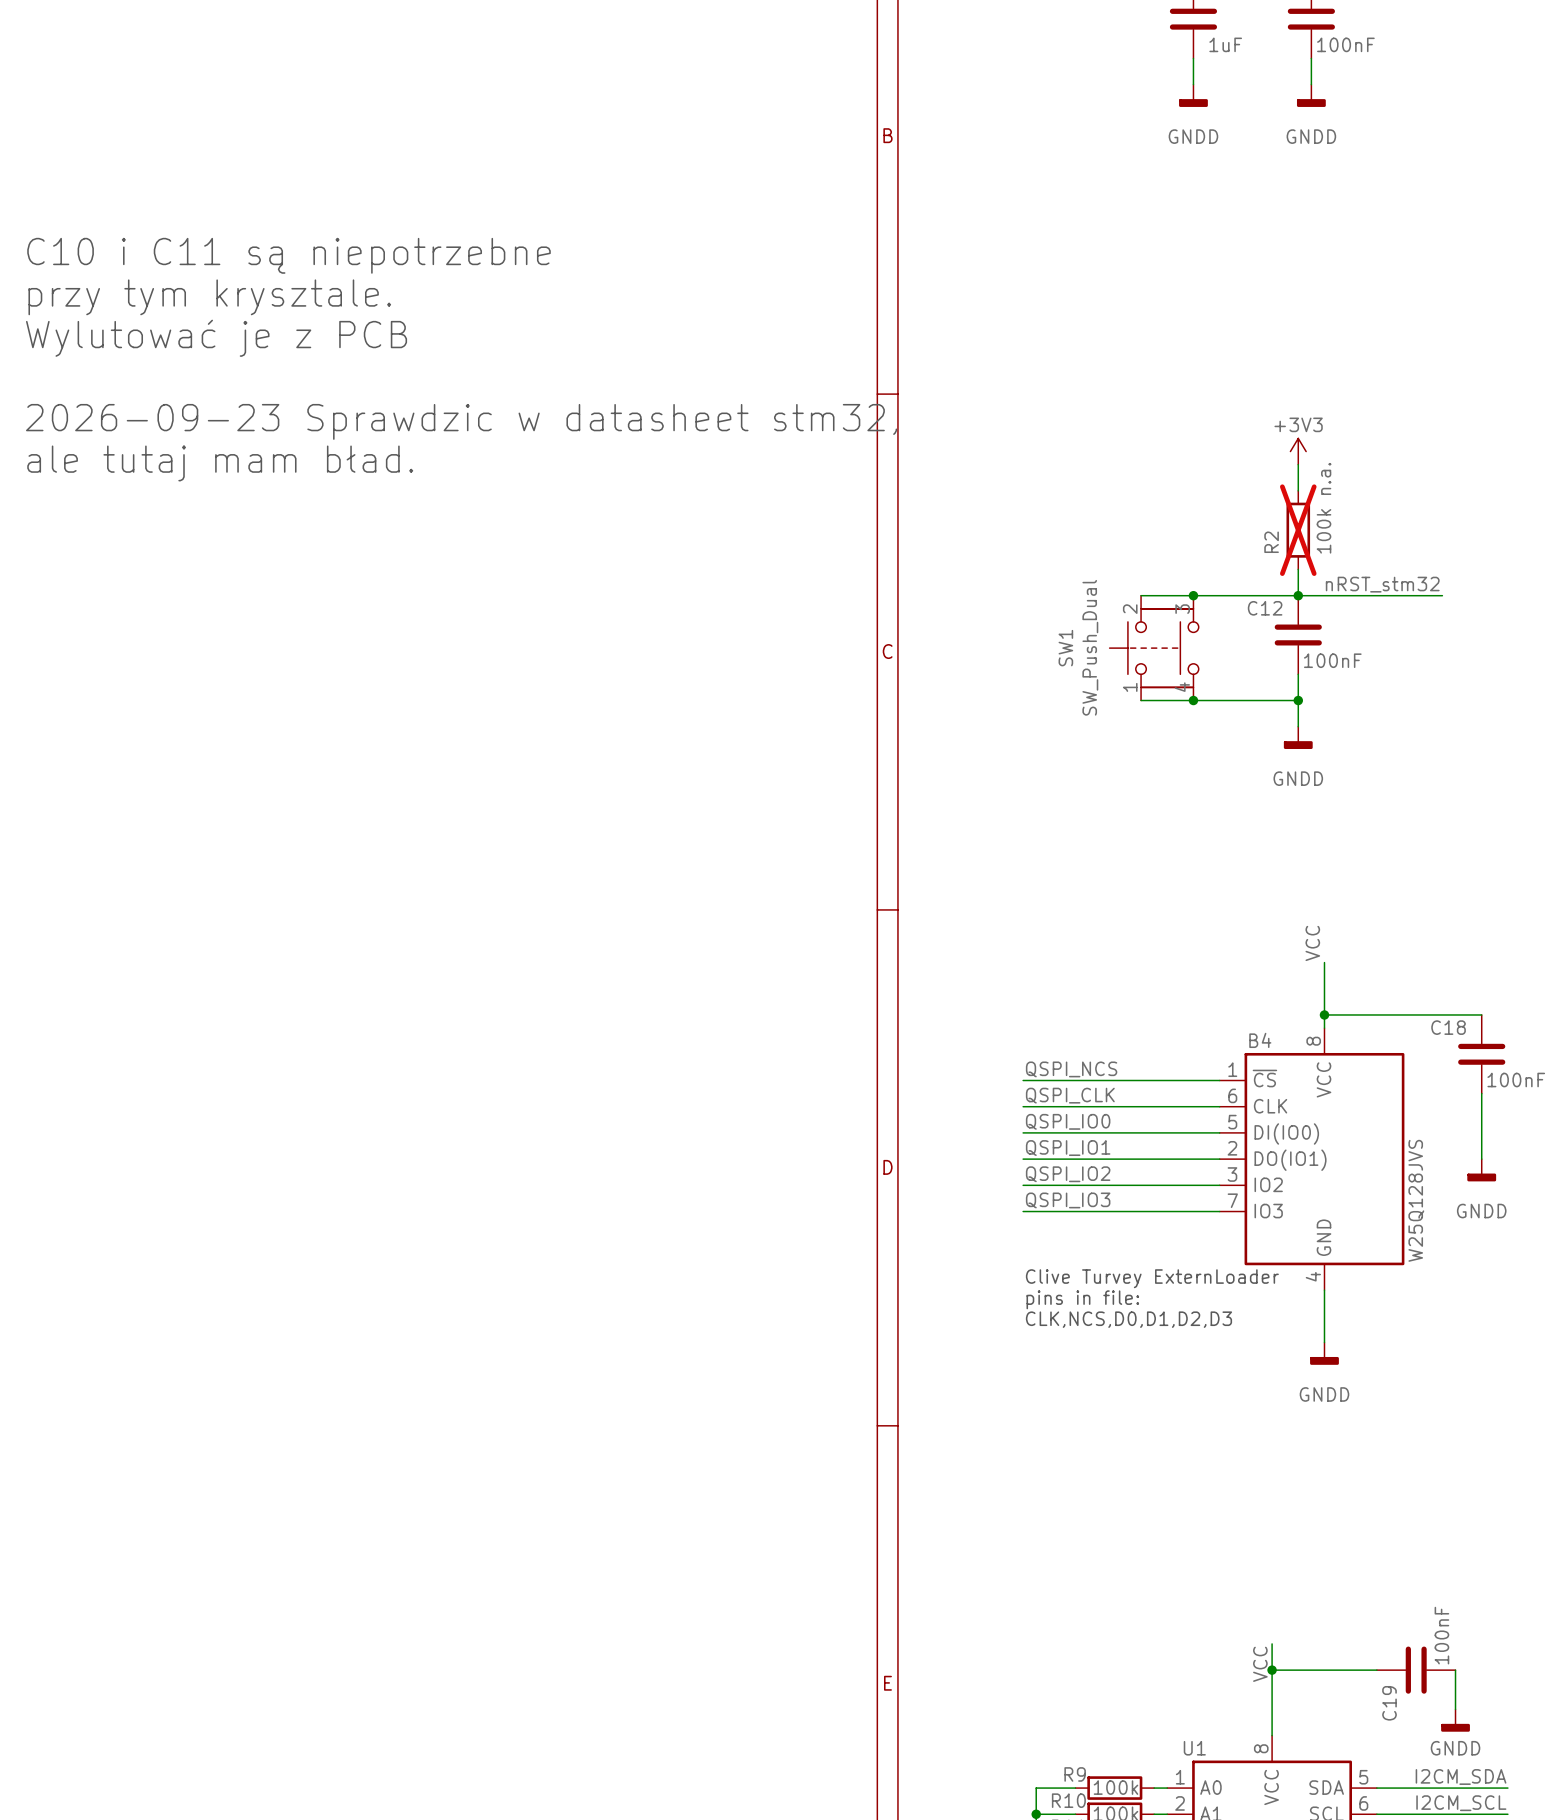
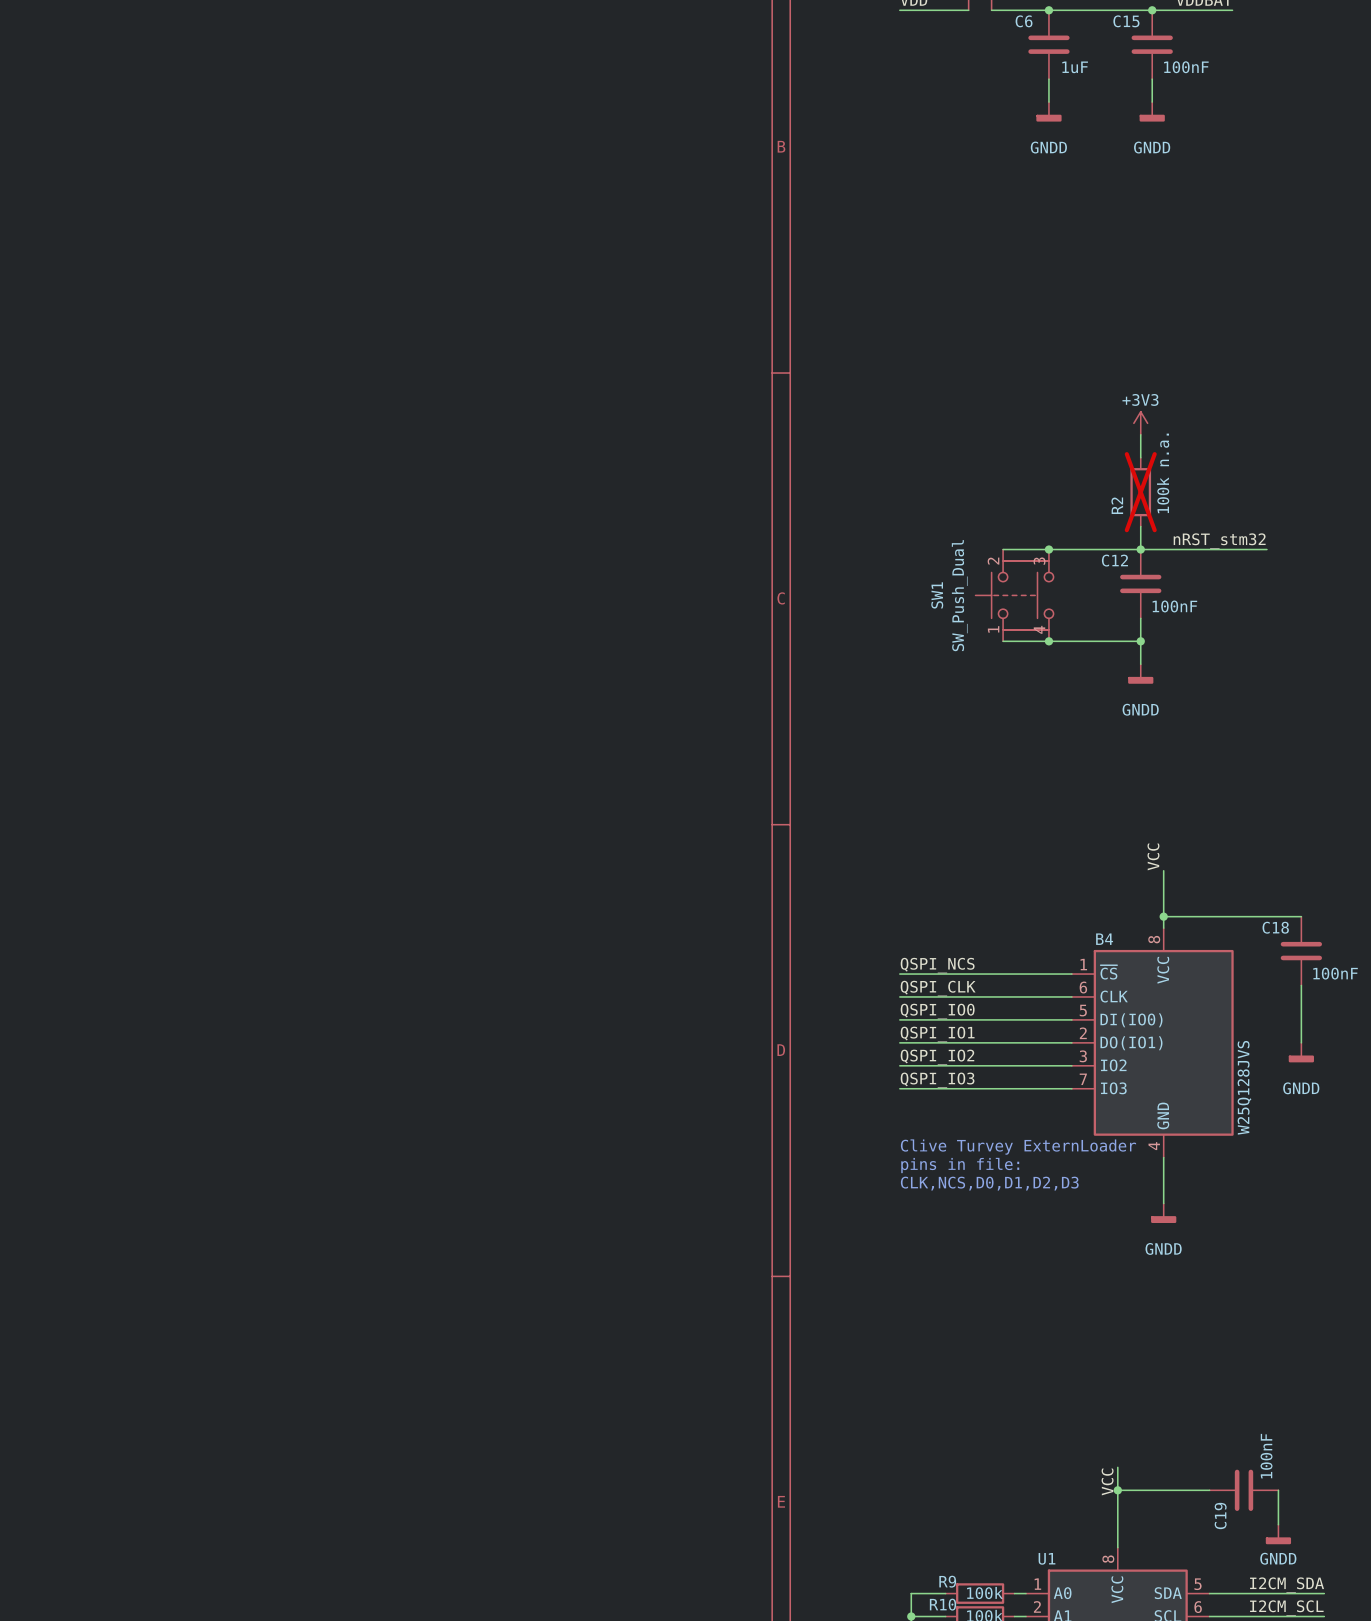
text: C10 i C11 są niepotrzebne (289, 255) -> none
text: przy tym krysztale. (209, 297) -> none
text: Wylutować je z PCB (216, 338) -> none
text: 2026-09-23 Sprawdzic w datasheet stm32, (461, 421) -> none
text: ale tutaj mam bład. (220, 463) -> none

